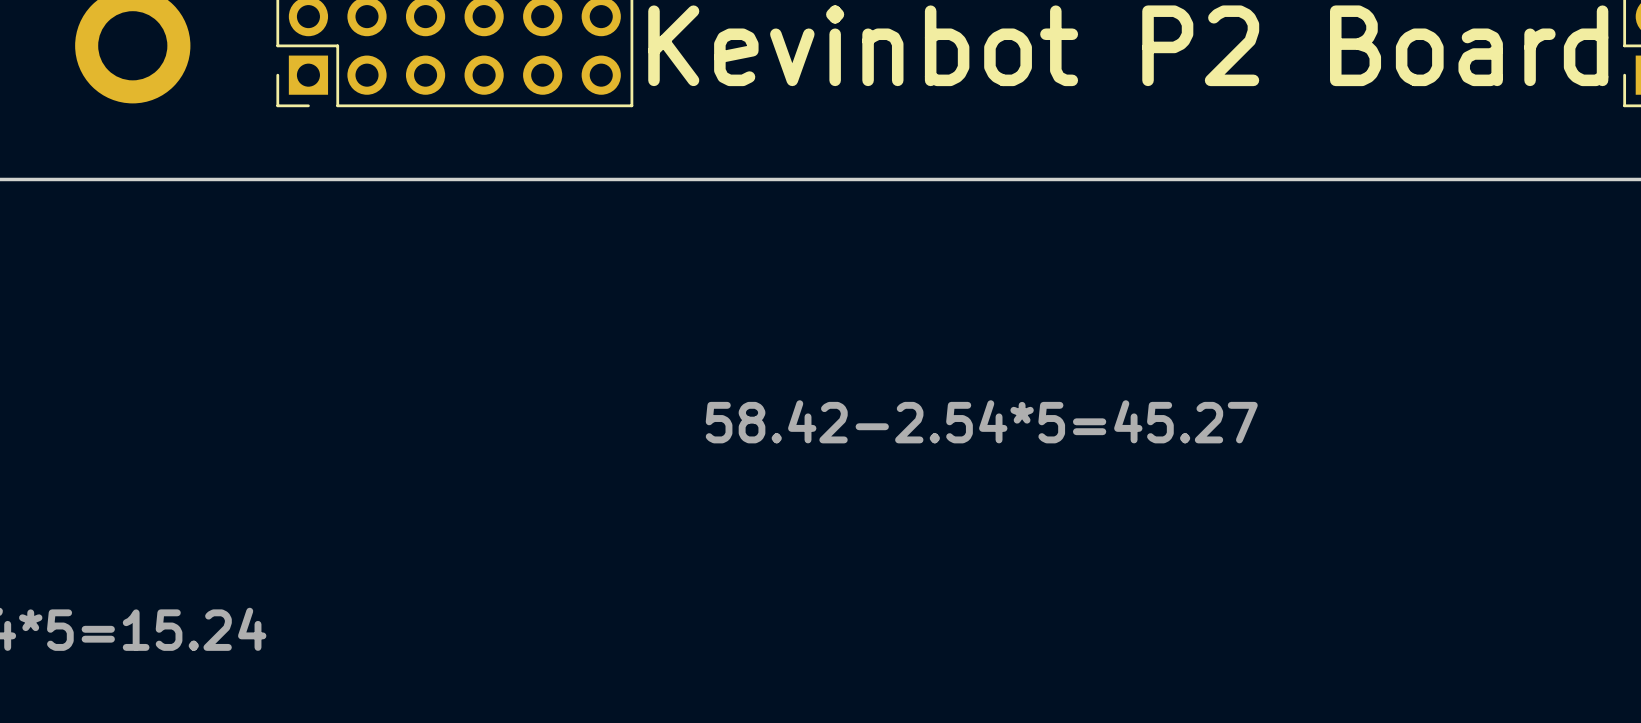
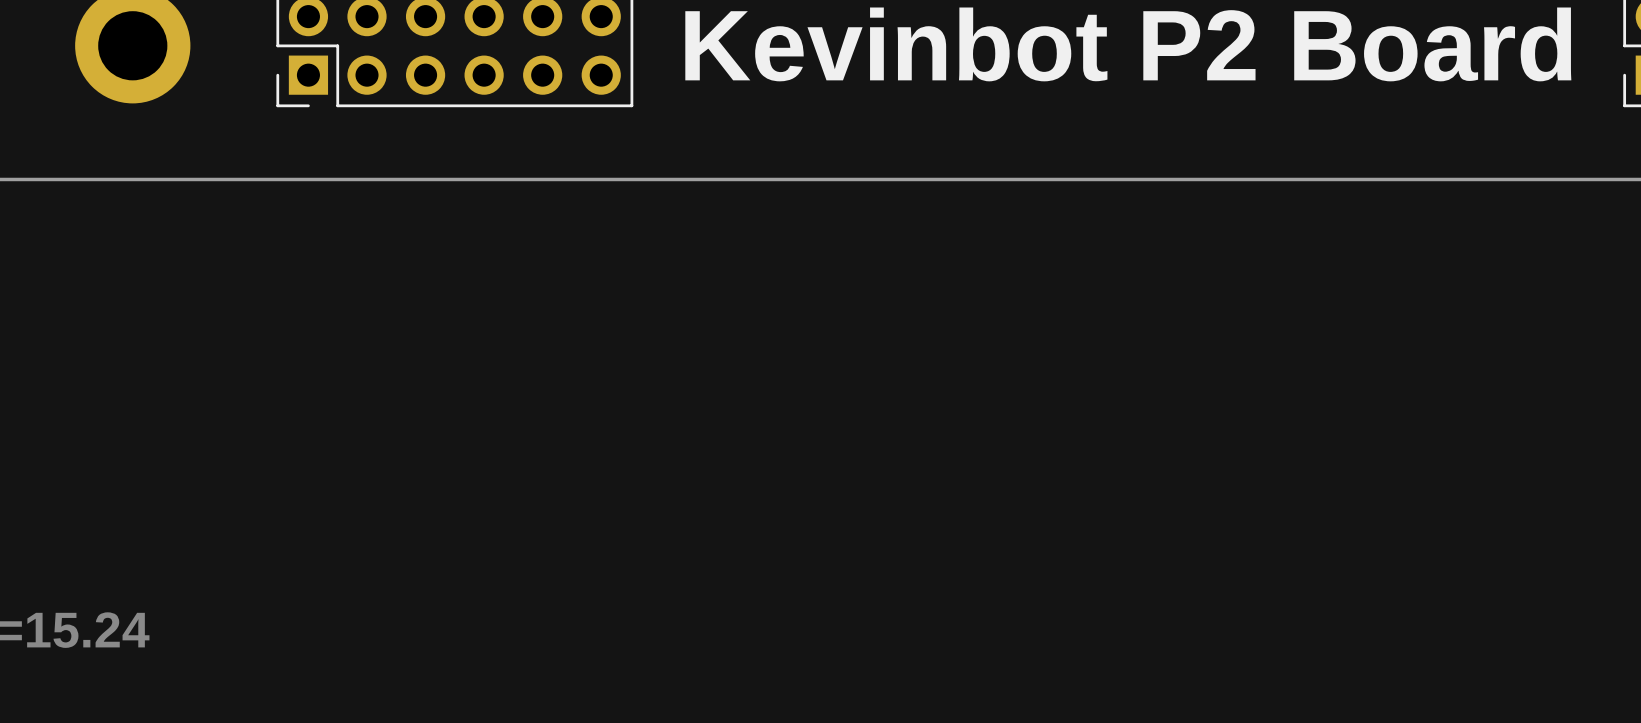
text: 58.42-2.54*5=45.27 (981, 421) -> none

